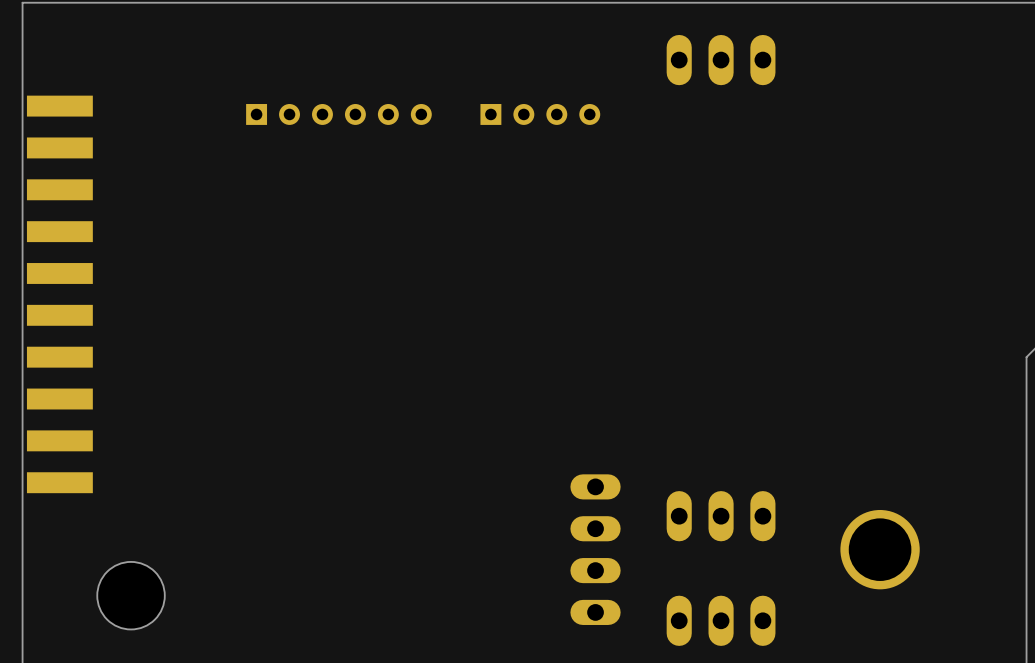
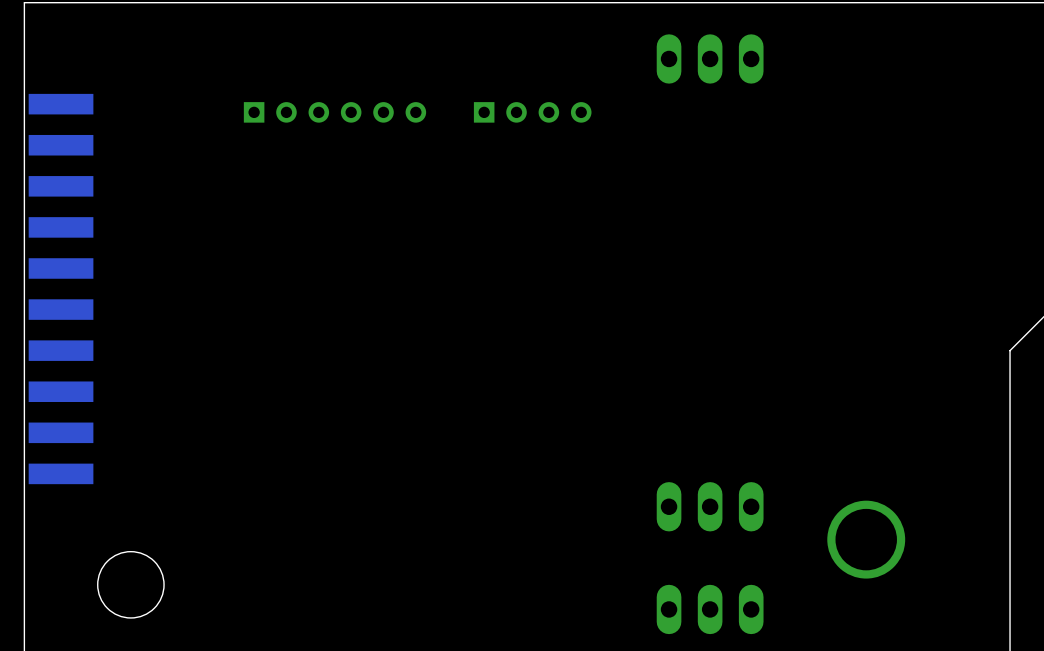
part: (595, 549) -> none

